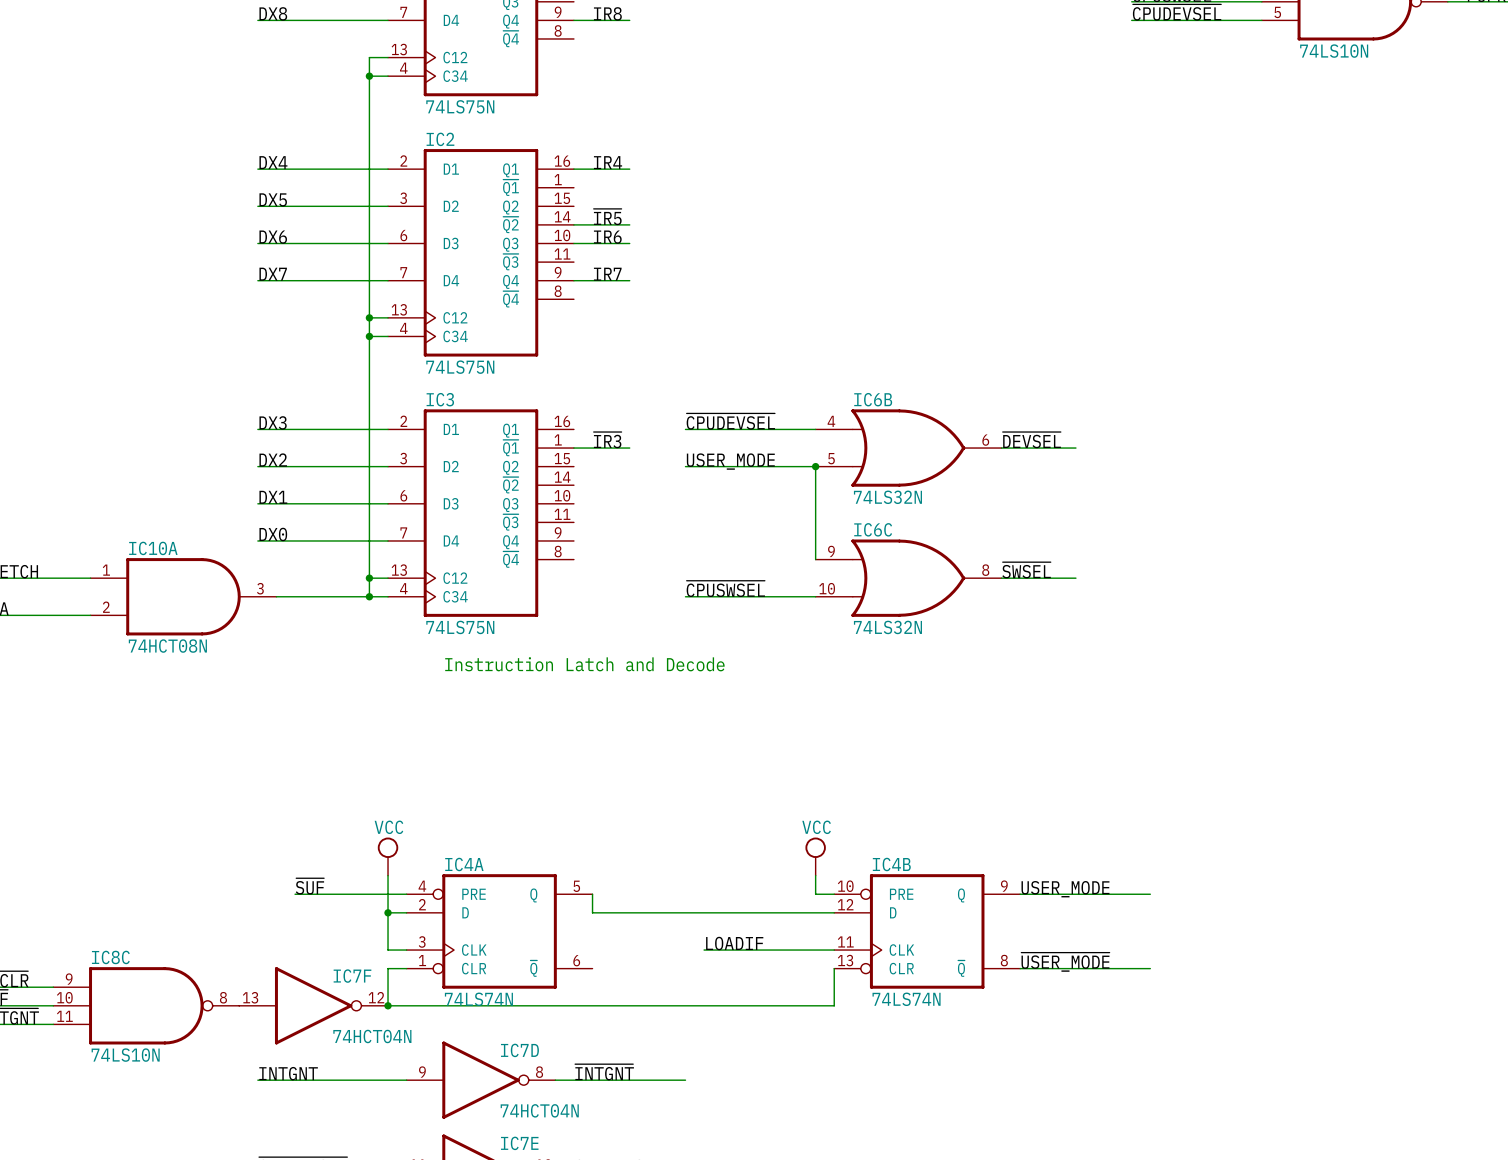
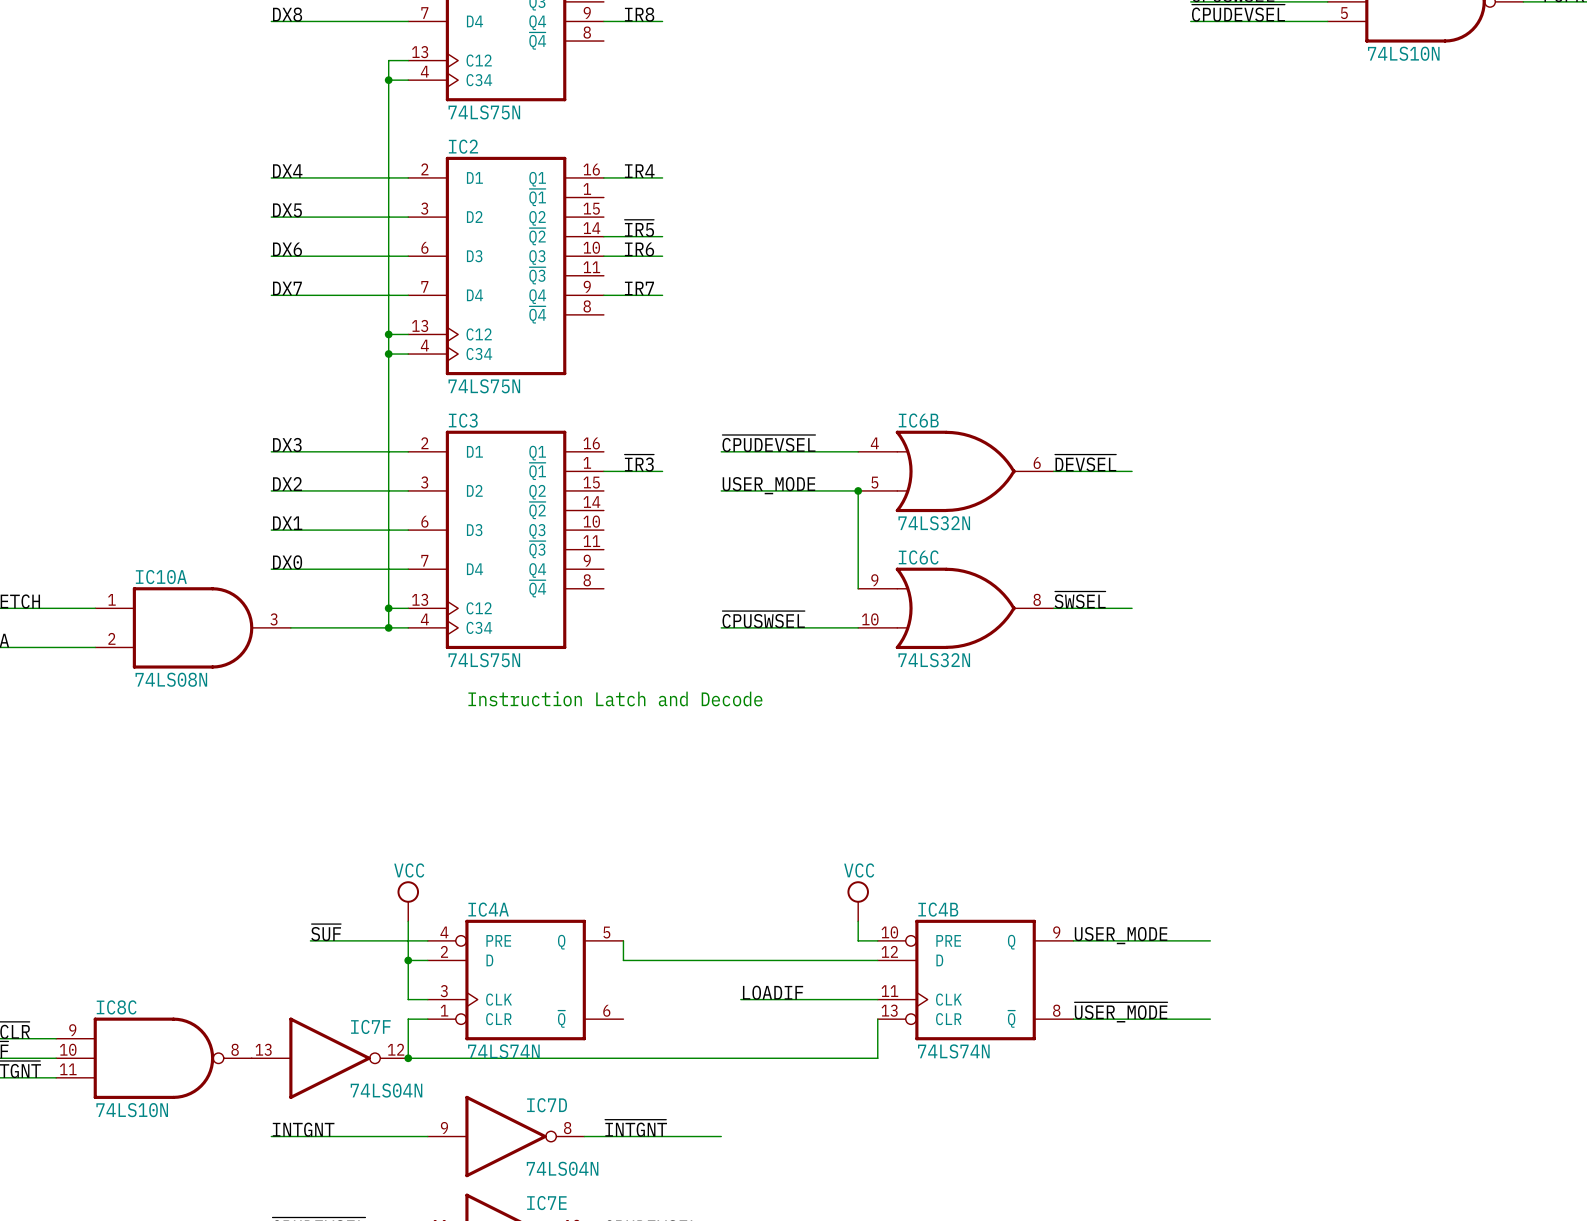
IC10A value: 74HCT08N (167, 646) -> 74LS08N (171, 679)
IC7F value: 74HCT04N (372, 1036) -> 74LS04N (386, 1090)
IC7D value: 74HCT04N (539, 1110) -> 74LS04N (562, 1168)

